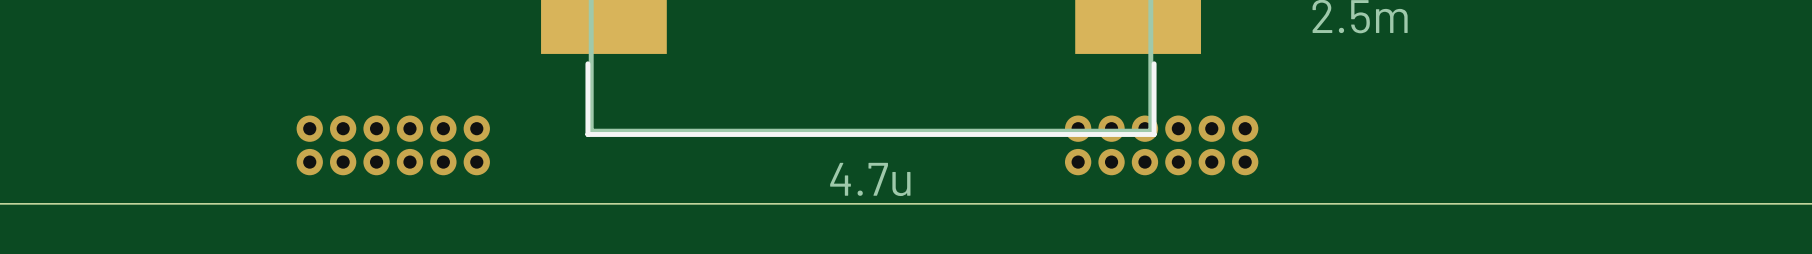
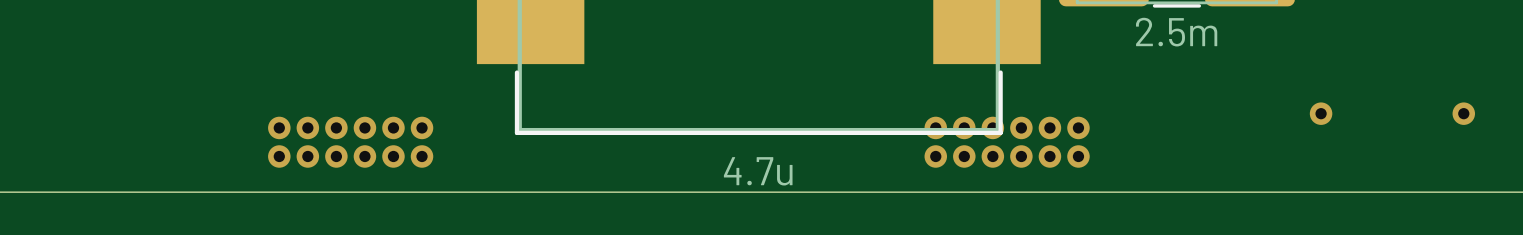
via: none -> (1321, 113)
via: none -> (1463, 113)

